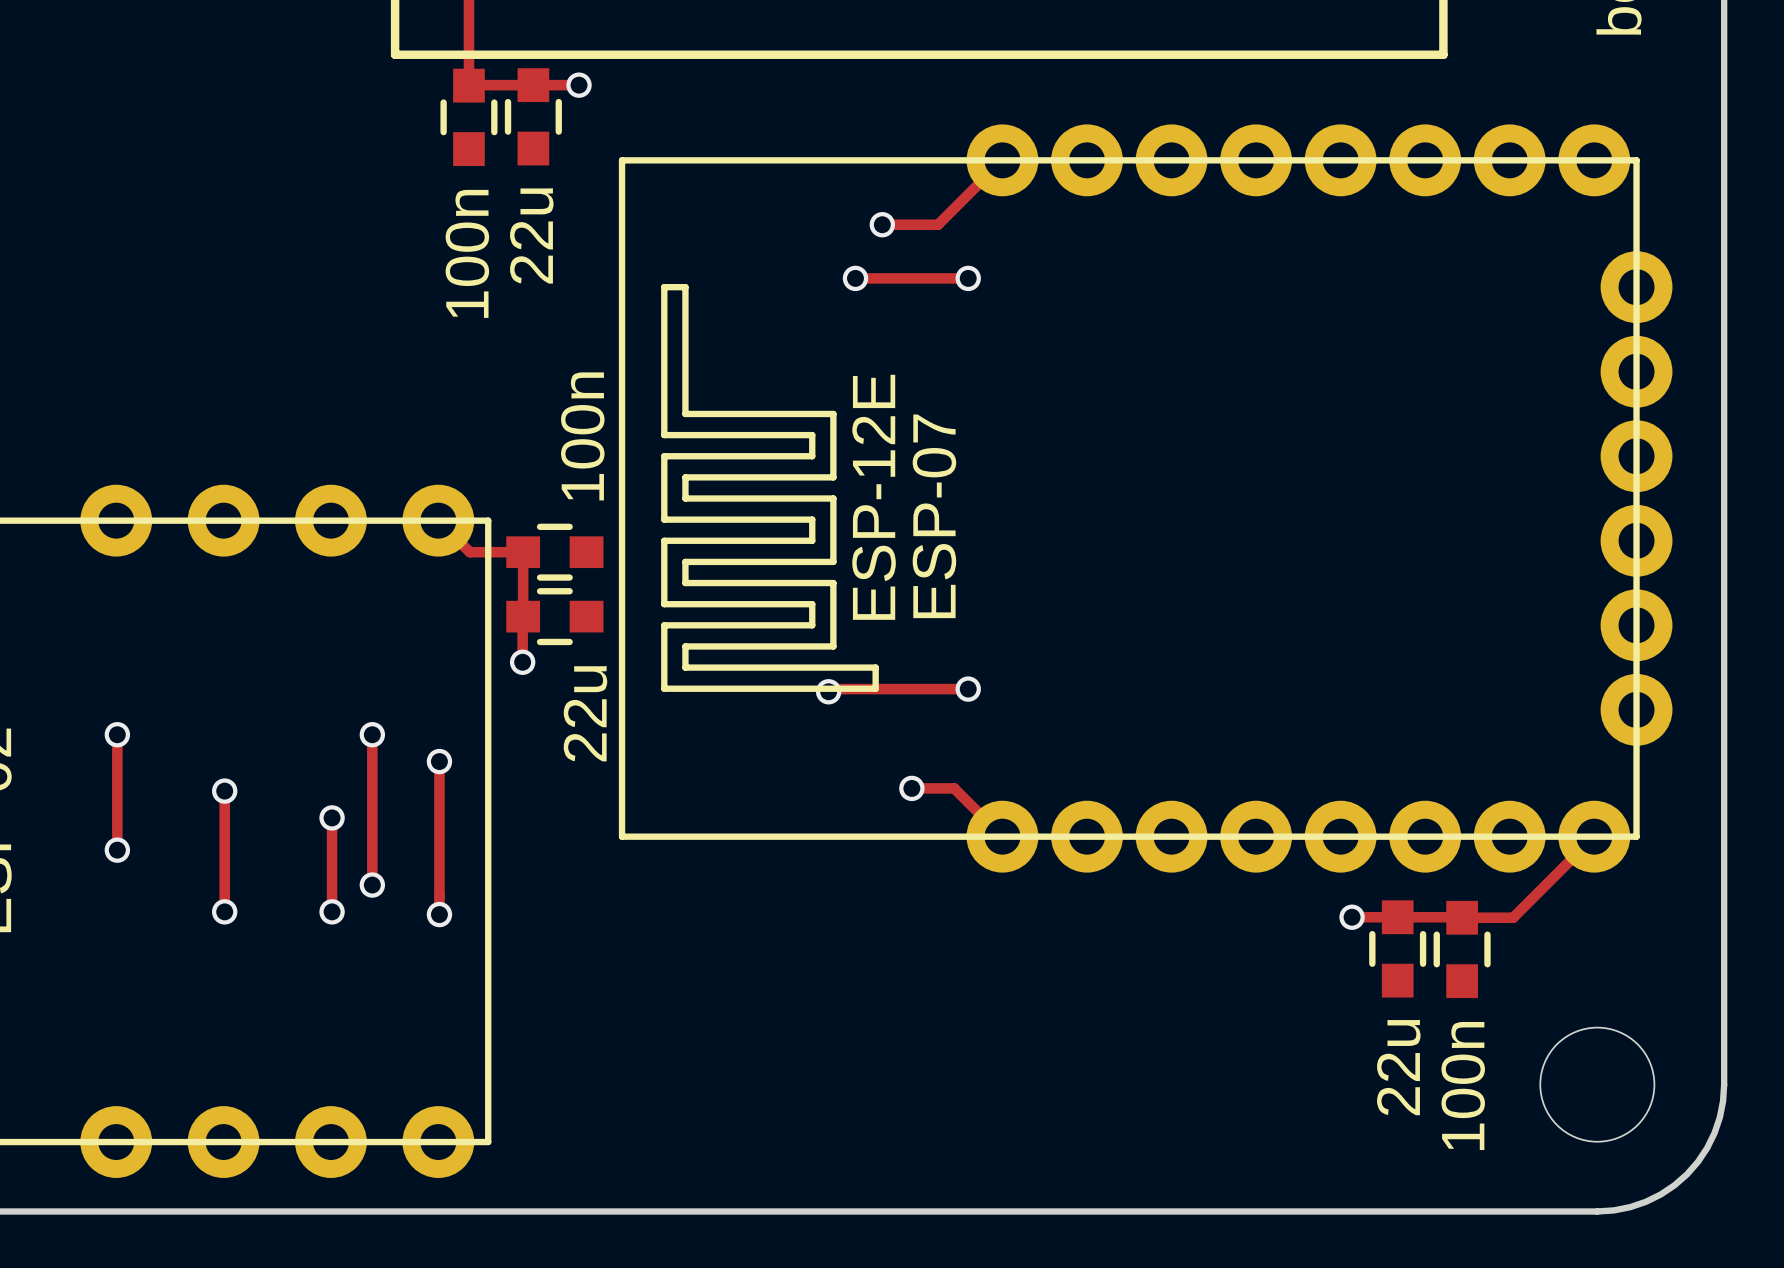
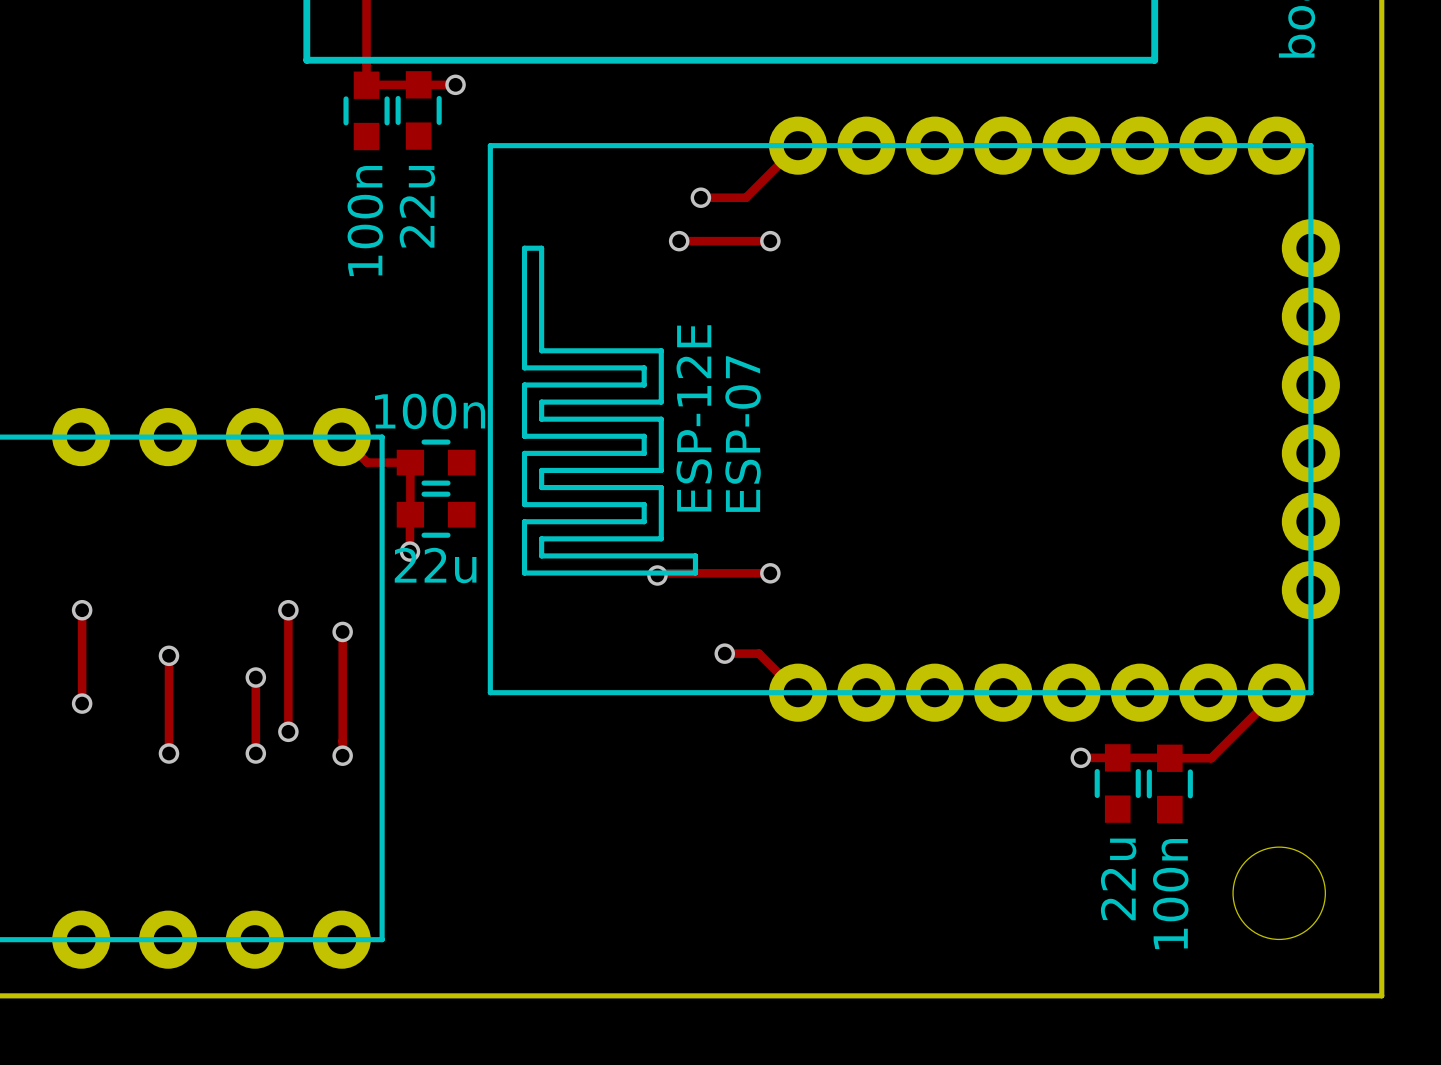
part value rotation: 0° (582, 436) -> 90° clockwise (430, 411)
part value rotation: 0° (585, 713) -> 90° clockwise (435, 565)
board edge: (1724, 1084) (1723, 1101) (1714, 1133) (1707, 1148) (1687, 1174) (1660, 1194) (1645, 1201) (1613, 1210) (1597, 1211) -> (1381, 893) (1381, 995) (1279, 995)

